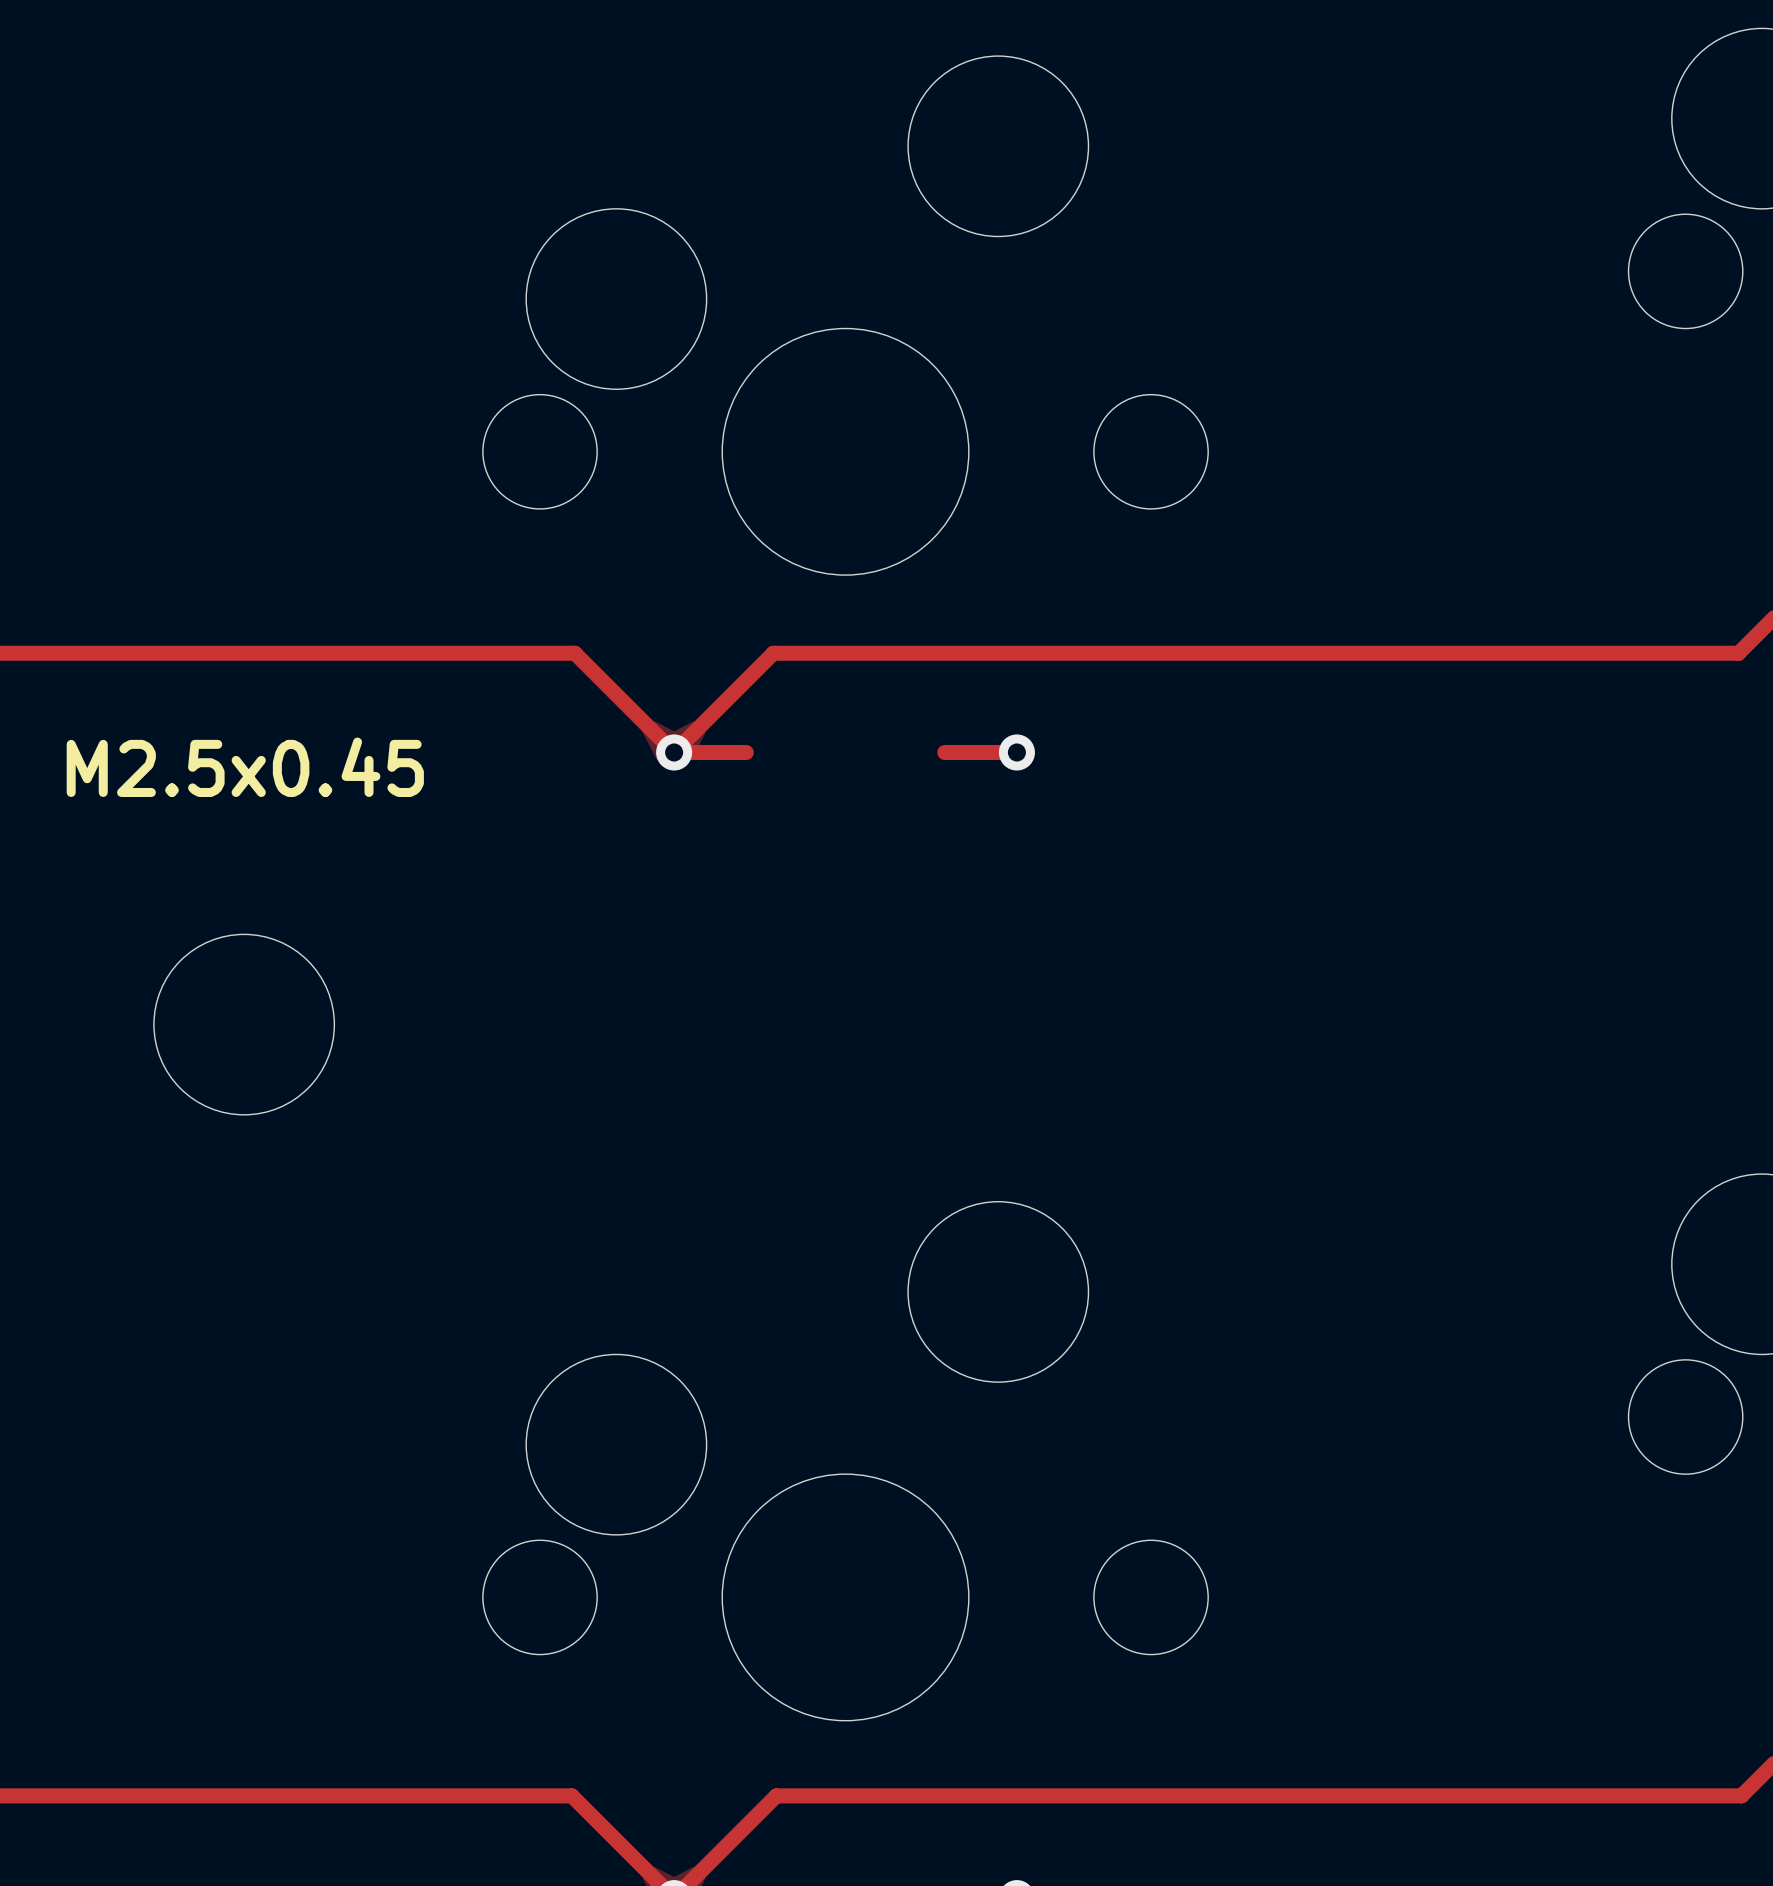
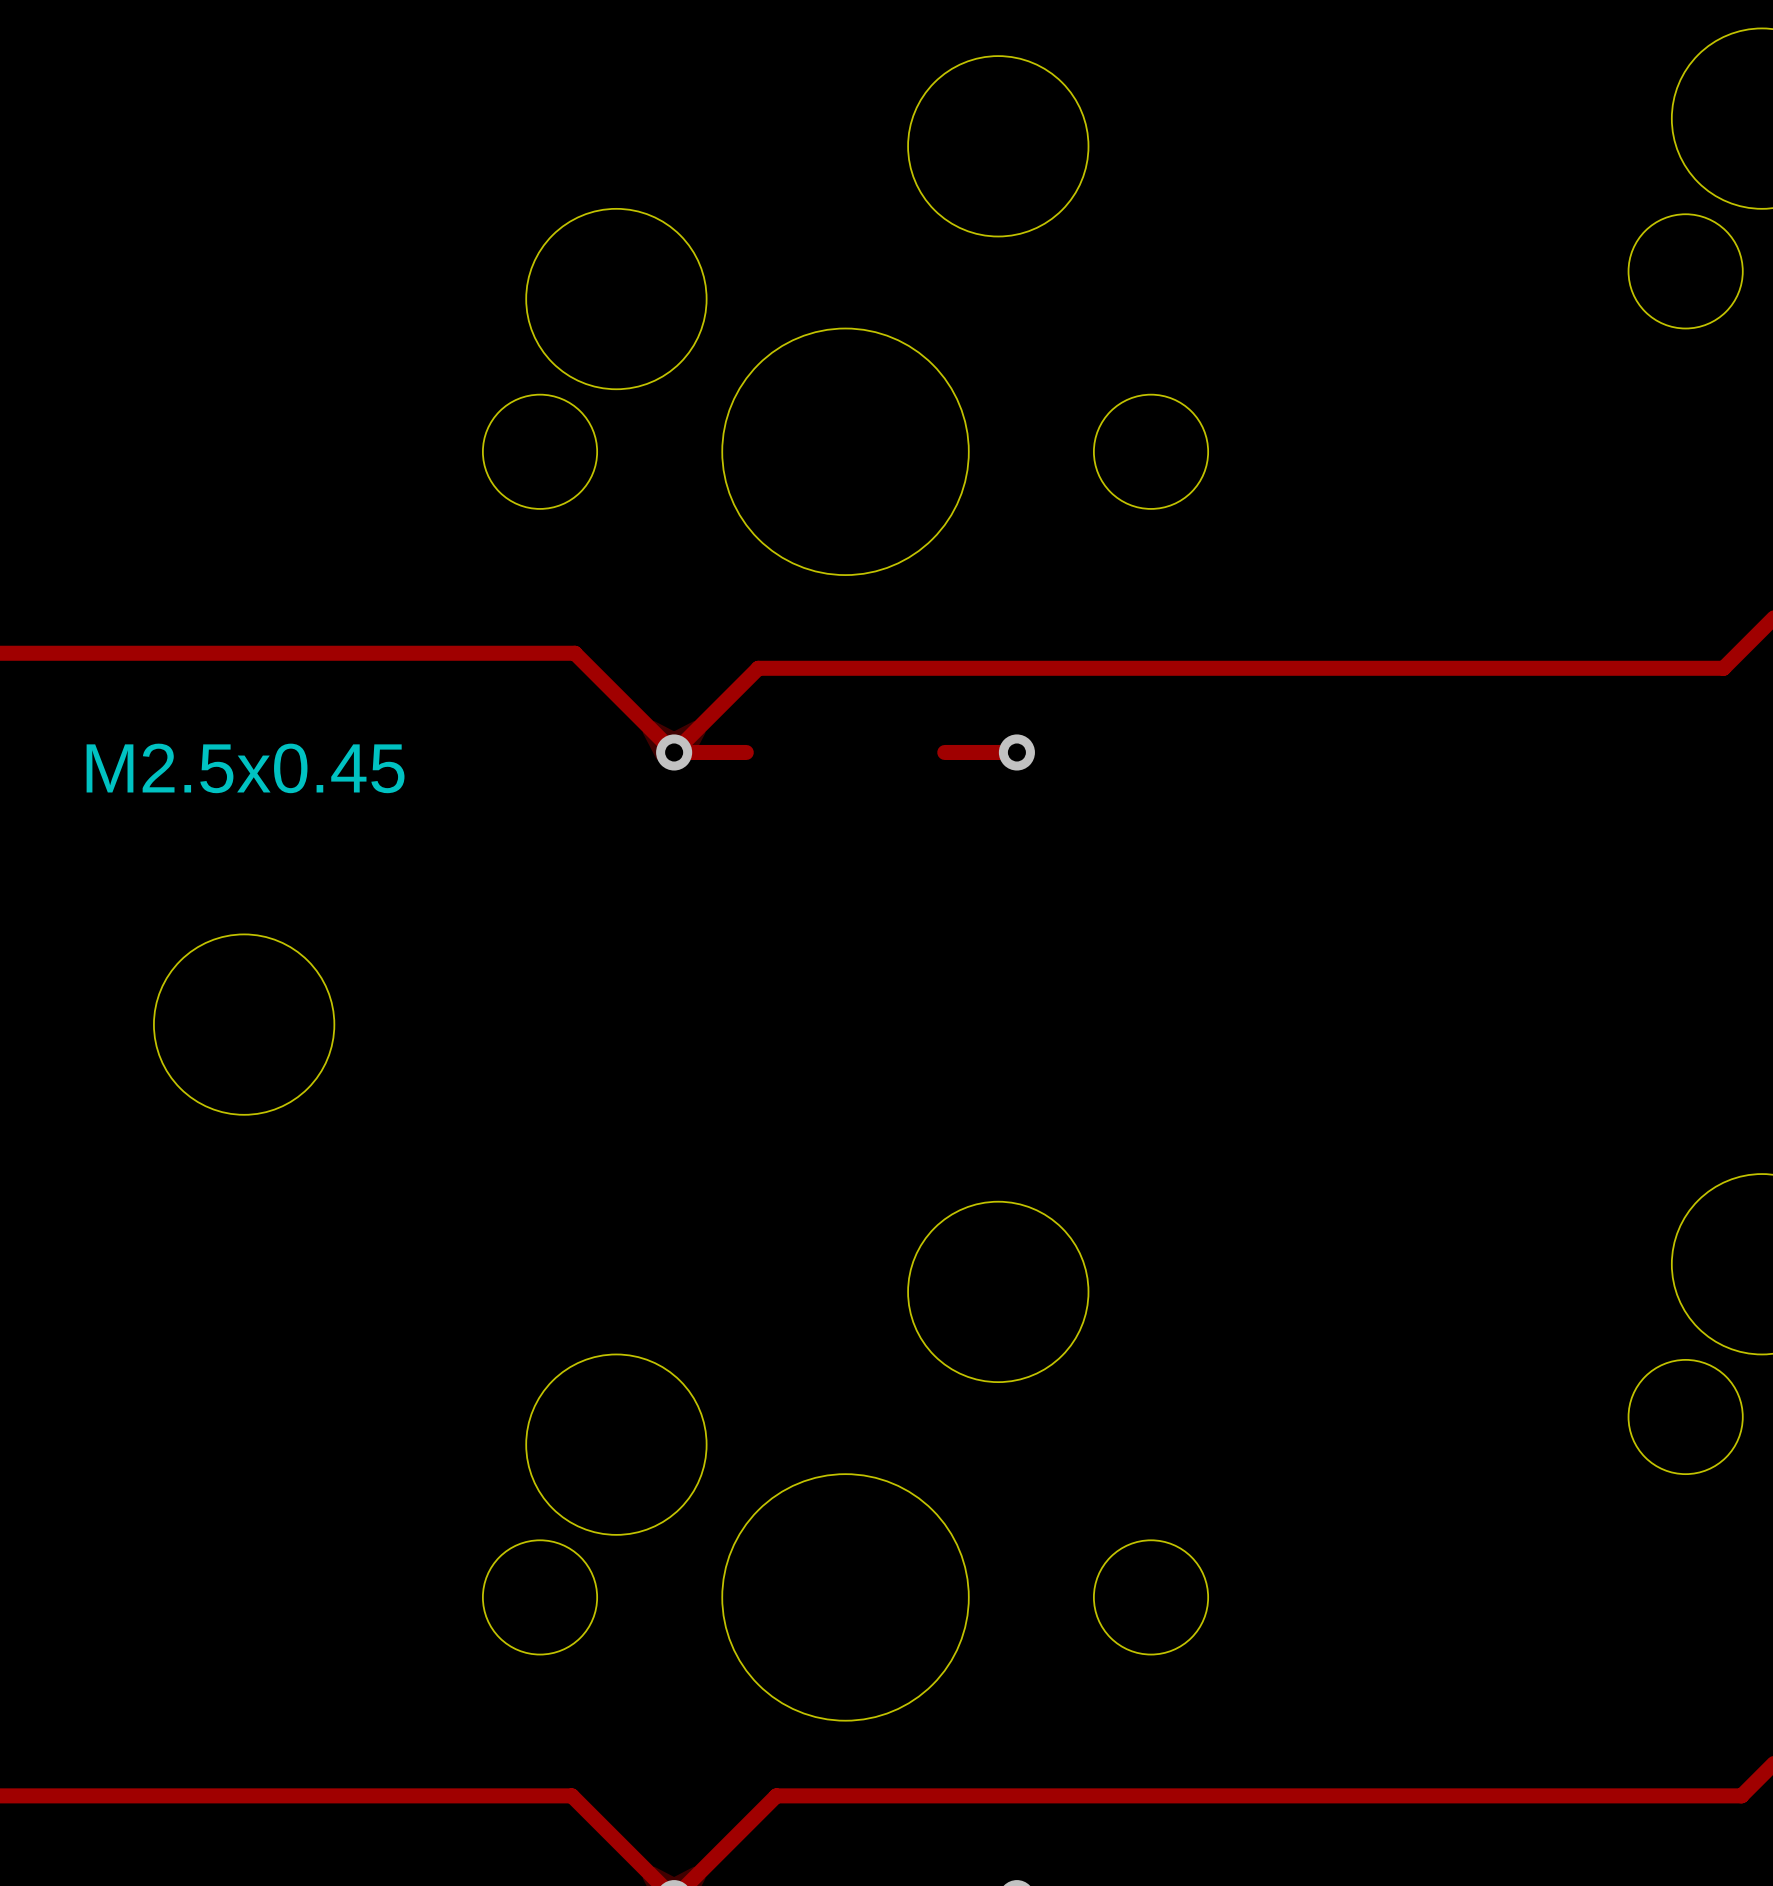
track: (1738, 653) (773, 653) (758, 668) -> (1738, 653) (1723, 668) (758, 668)

